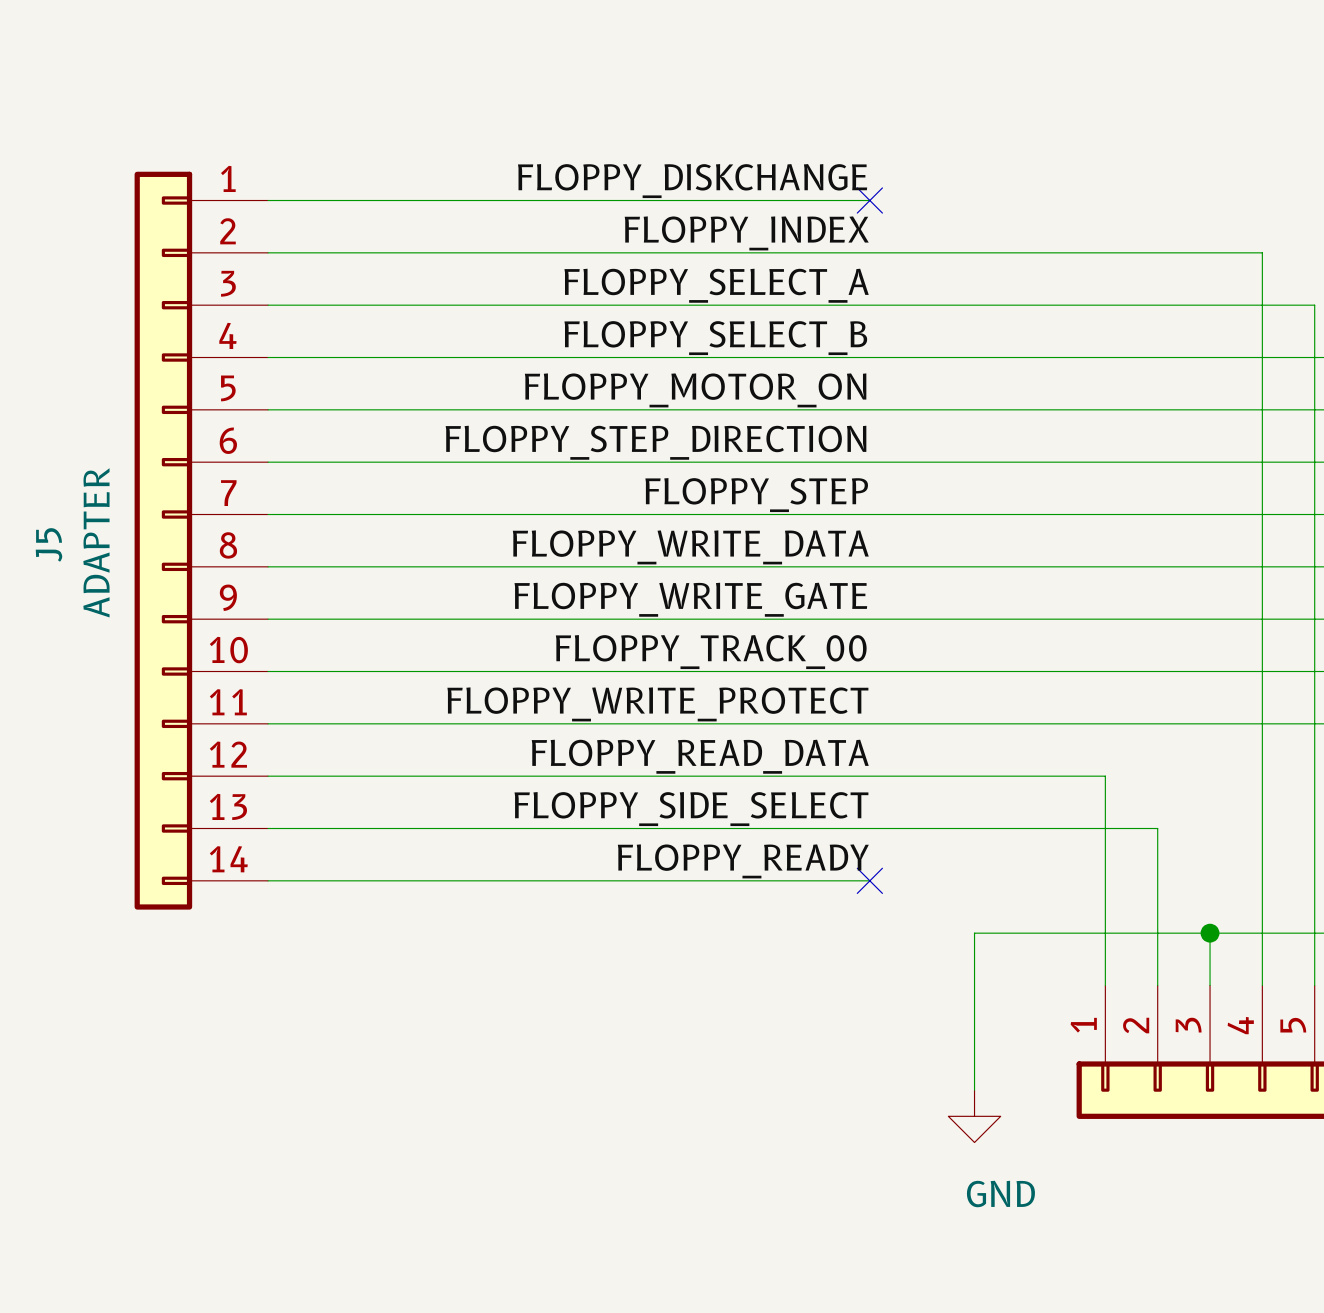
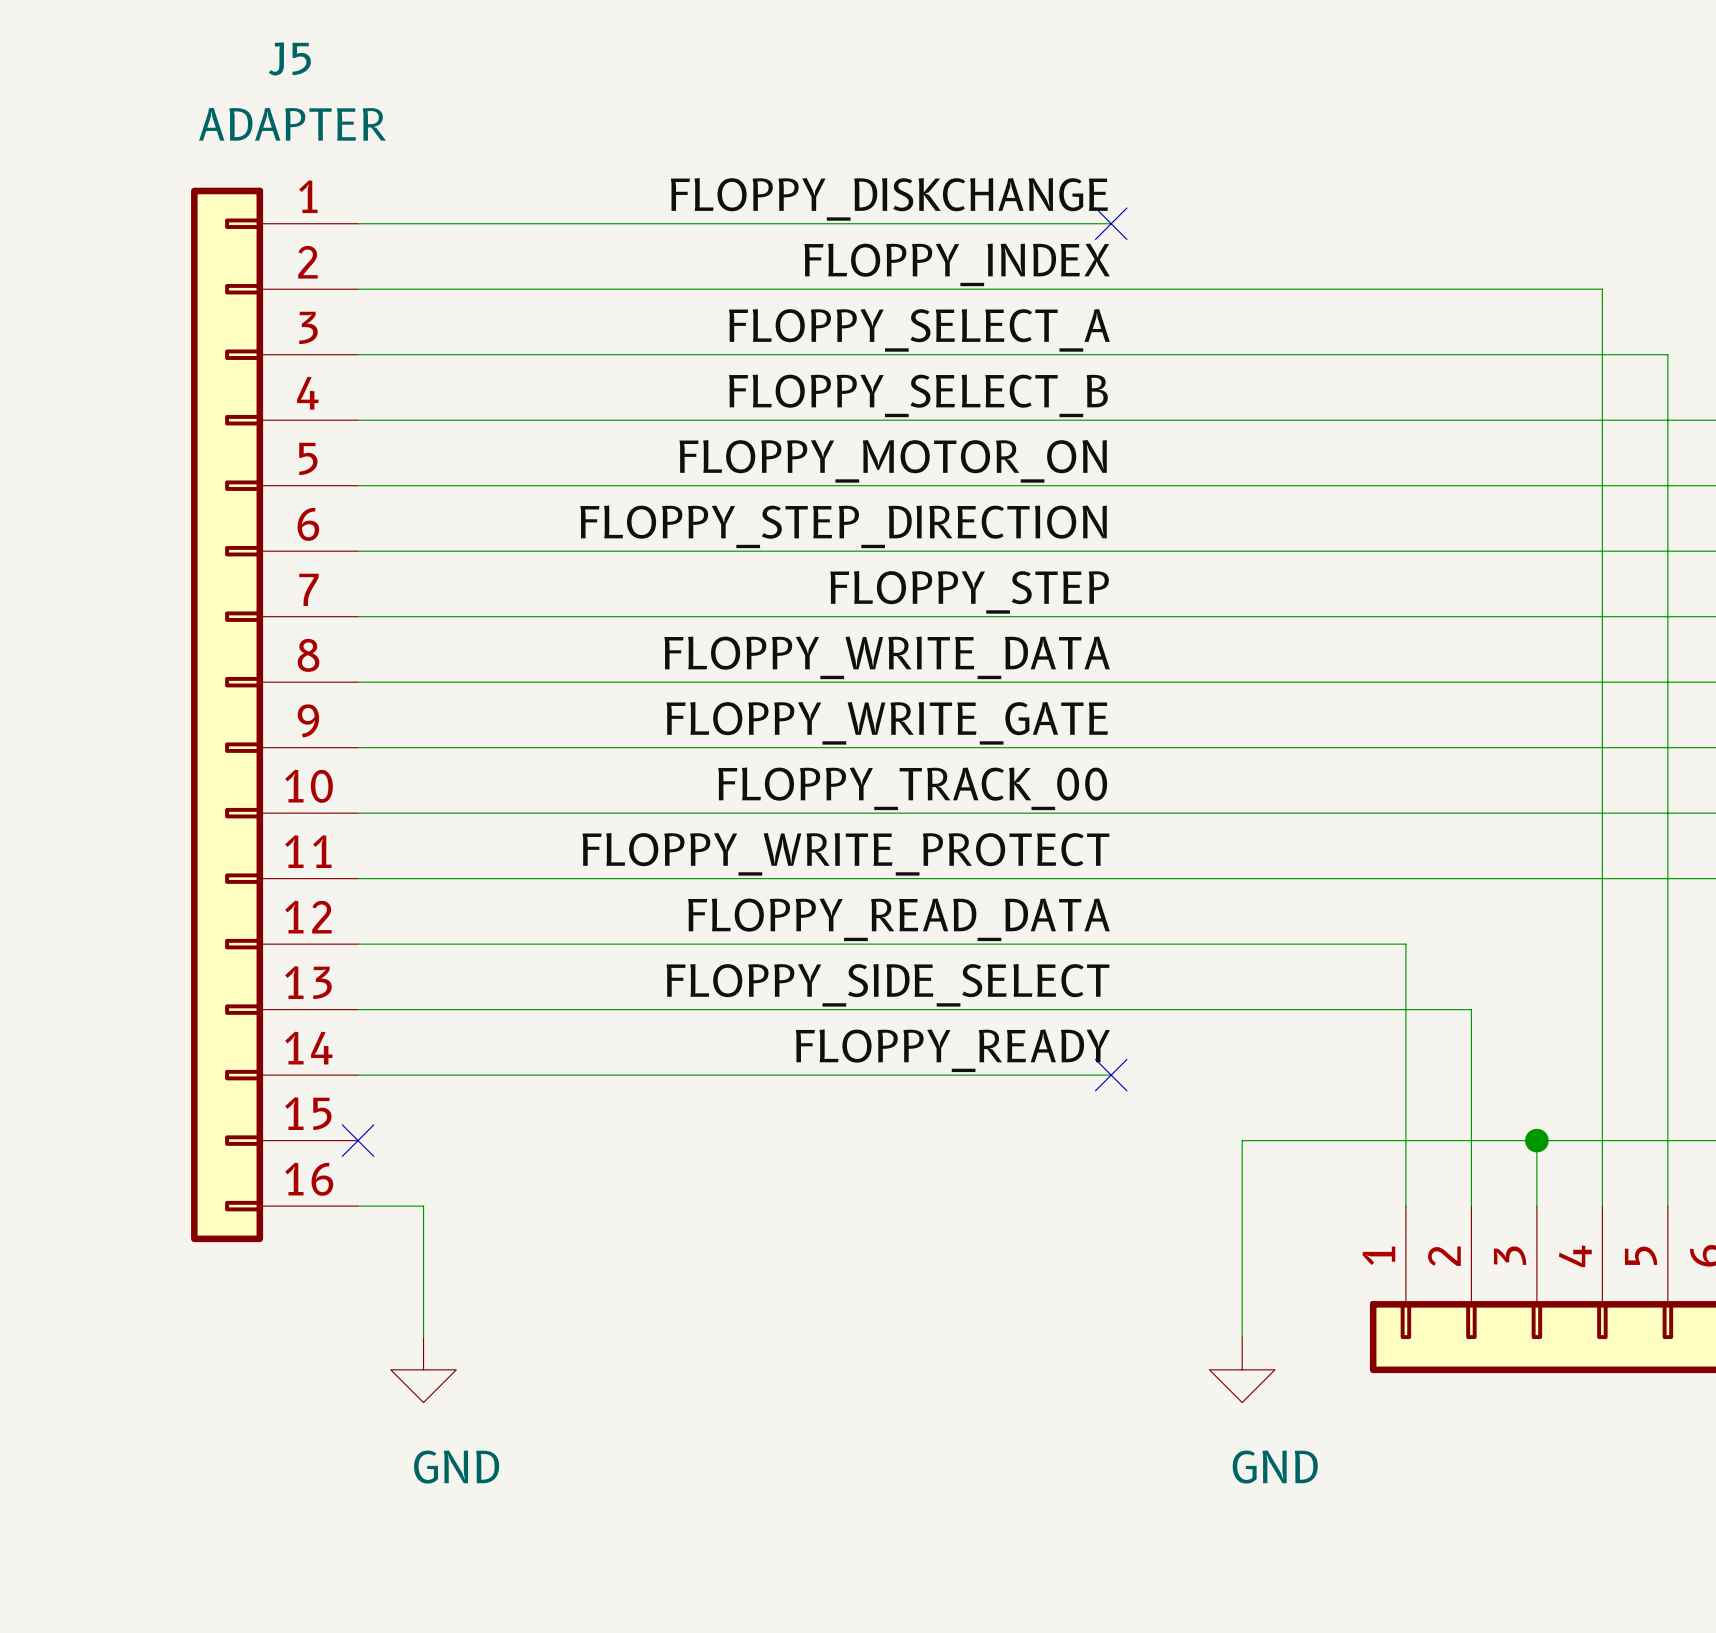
J5 symbol: [134, 171, 269, 910] -> [191, 187, 359, 1243]
J5 value position: ADAPTER (96, 542) -> ADAPTER (292, 124)
J5 name position: J5 (48, 544) -> J5 (289, 58)
no-connect mark: none -> (358, 1140)
wire: none -> (358, 1206) (423, 1206) (423, 1337)
power symbol: none -> GND (423, 1369)

